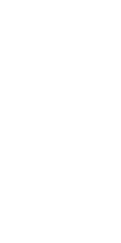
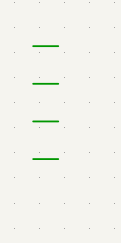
wire: none -> (33, 46) (58, 46)
wire: none -> (33, 83) (58, 83)
wire: none -> (33, 121) (58, 121)
wire: none -> (33, 159) (58, 159)

